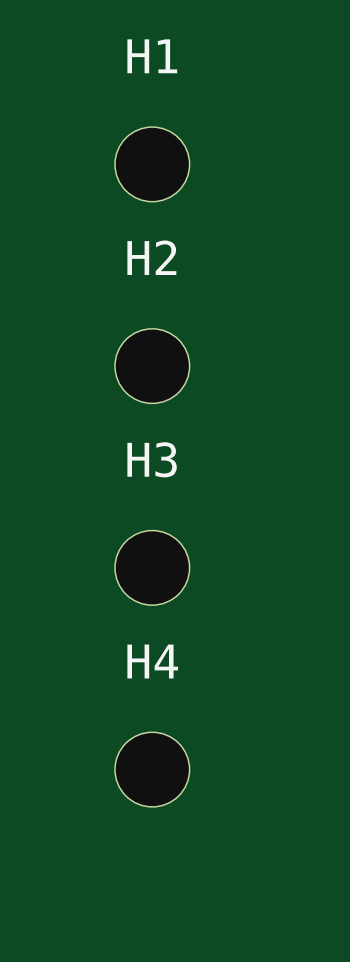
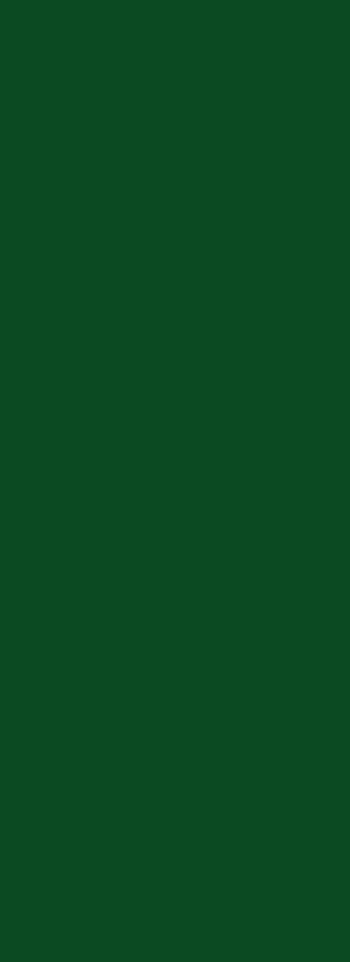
H1: (152, 164) -> none
H2: (152, 366) -> none
H3: (152, 567) -> none
H4: (152, 769) -> none

